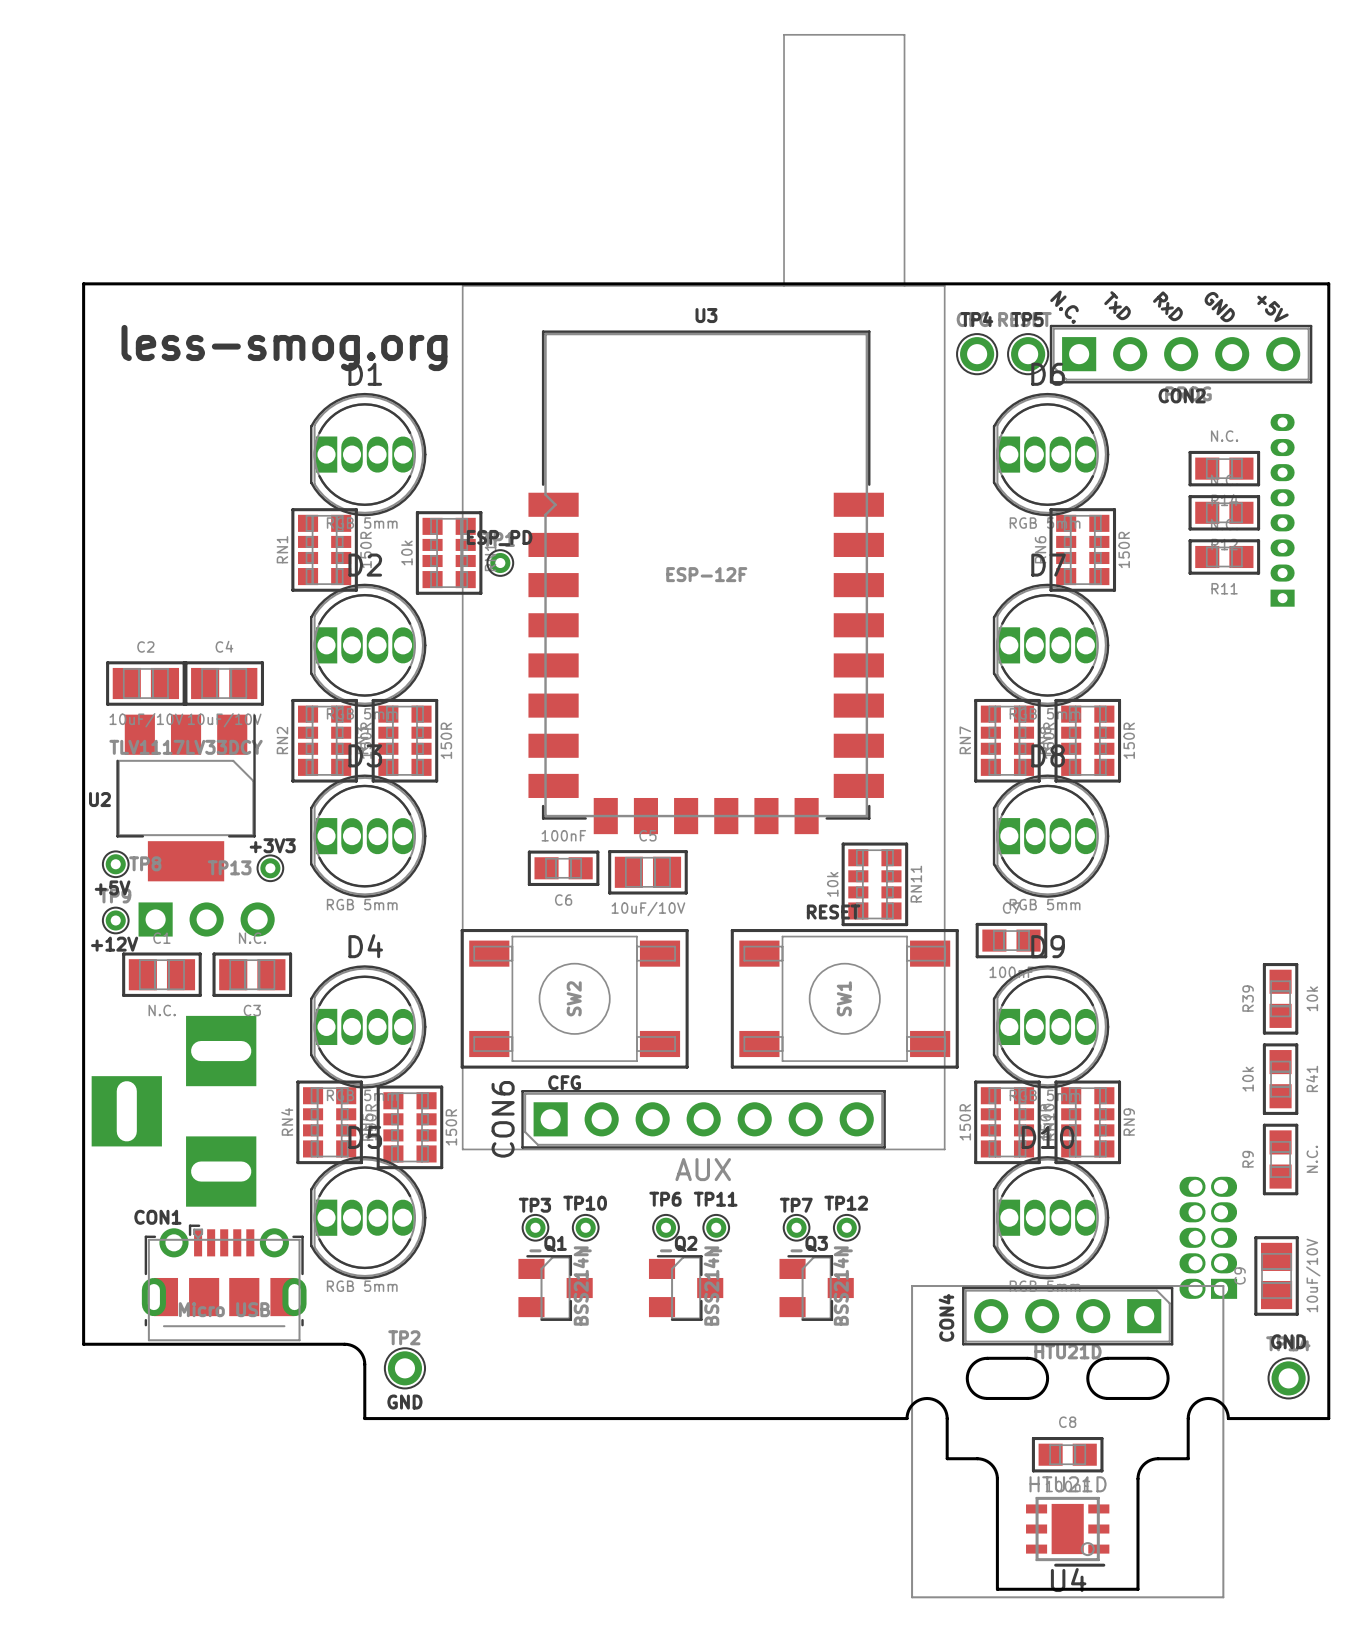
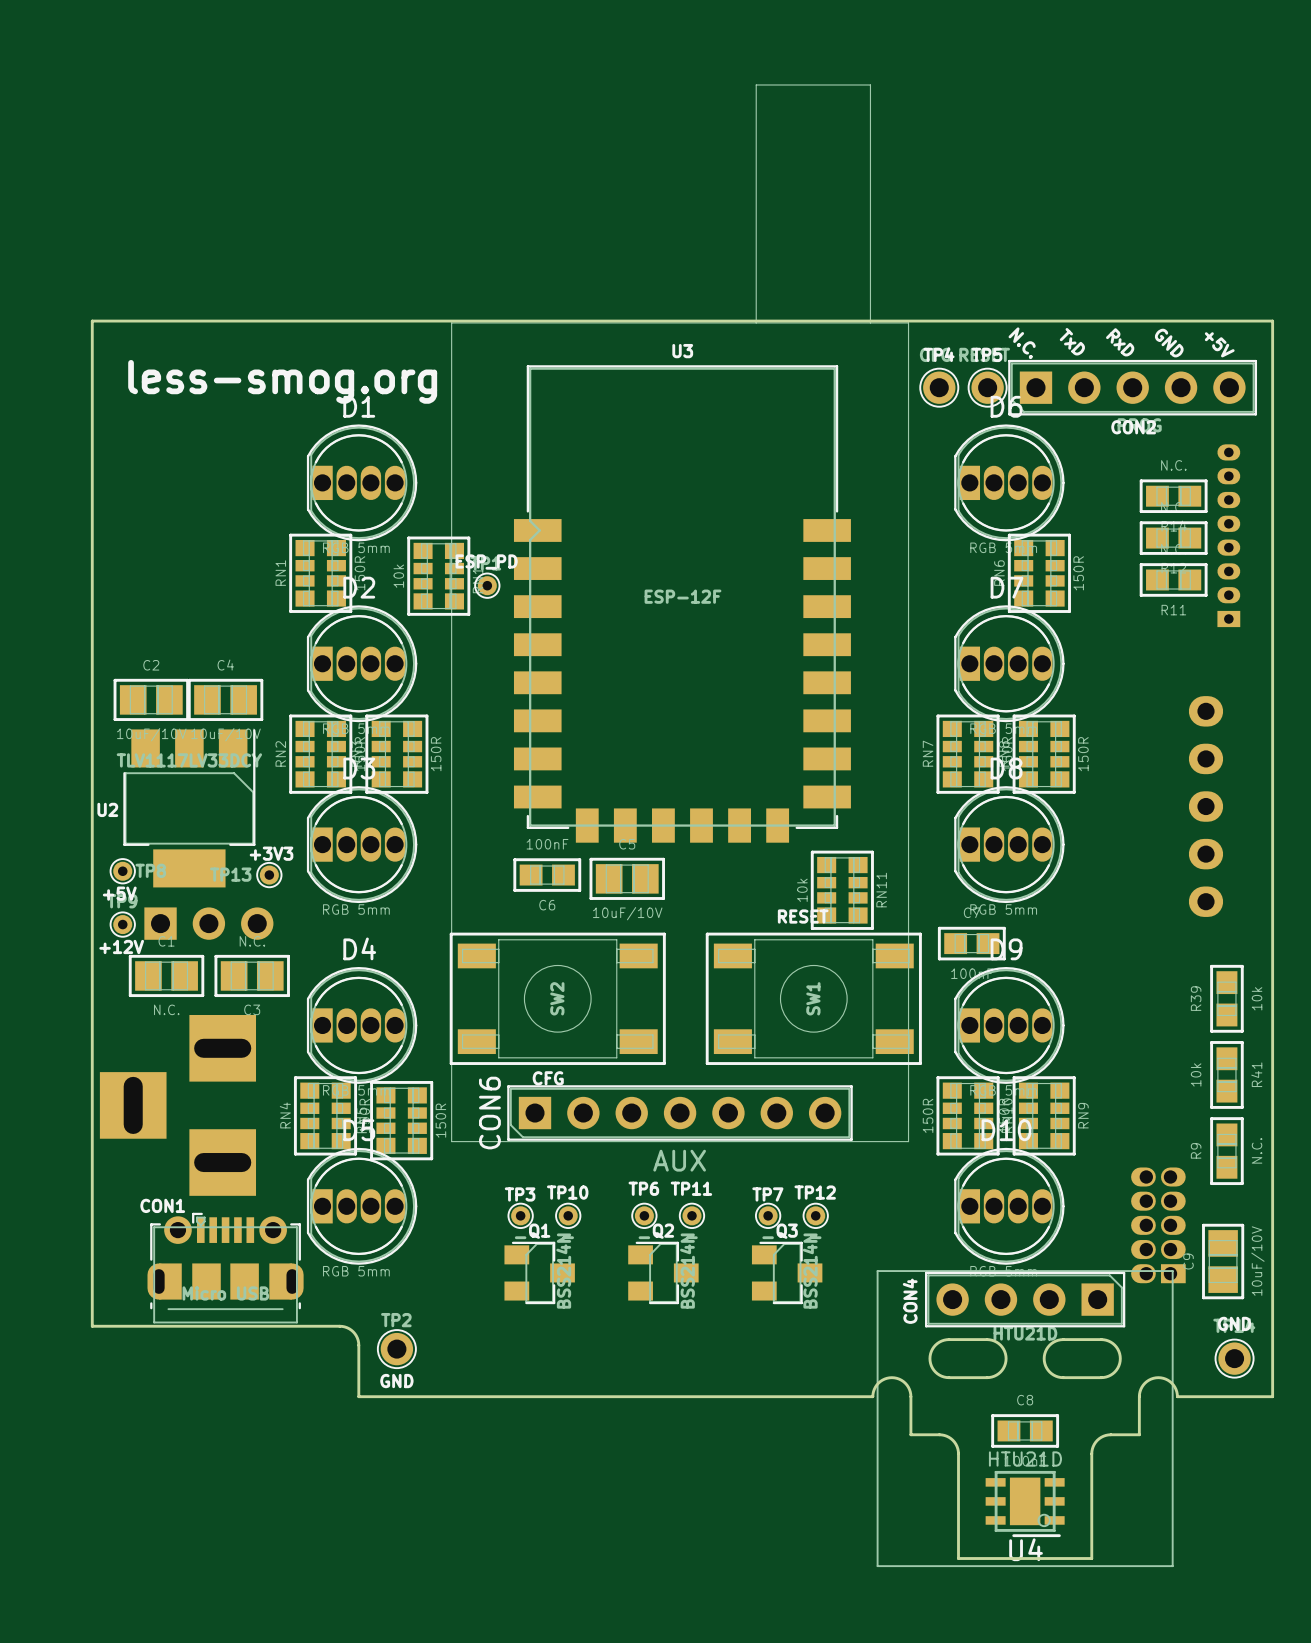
part: none -> (1205, 806)

